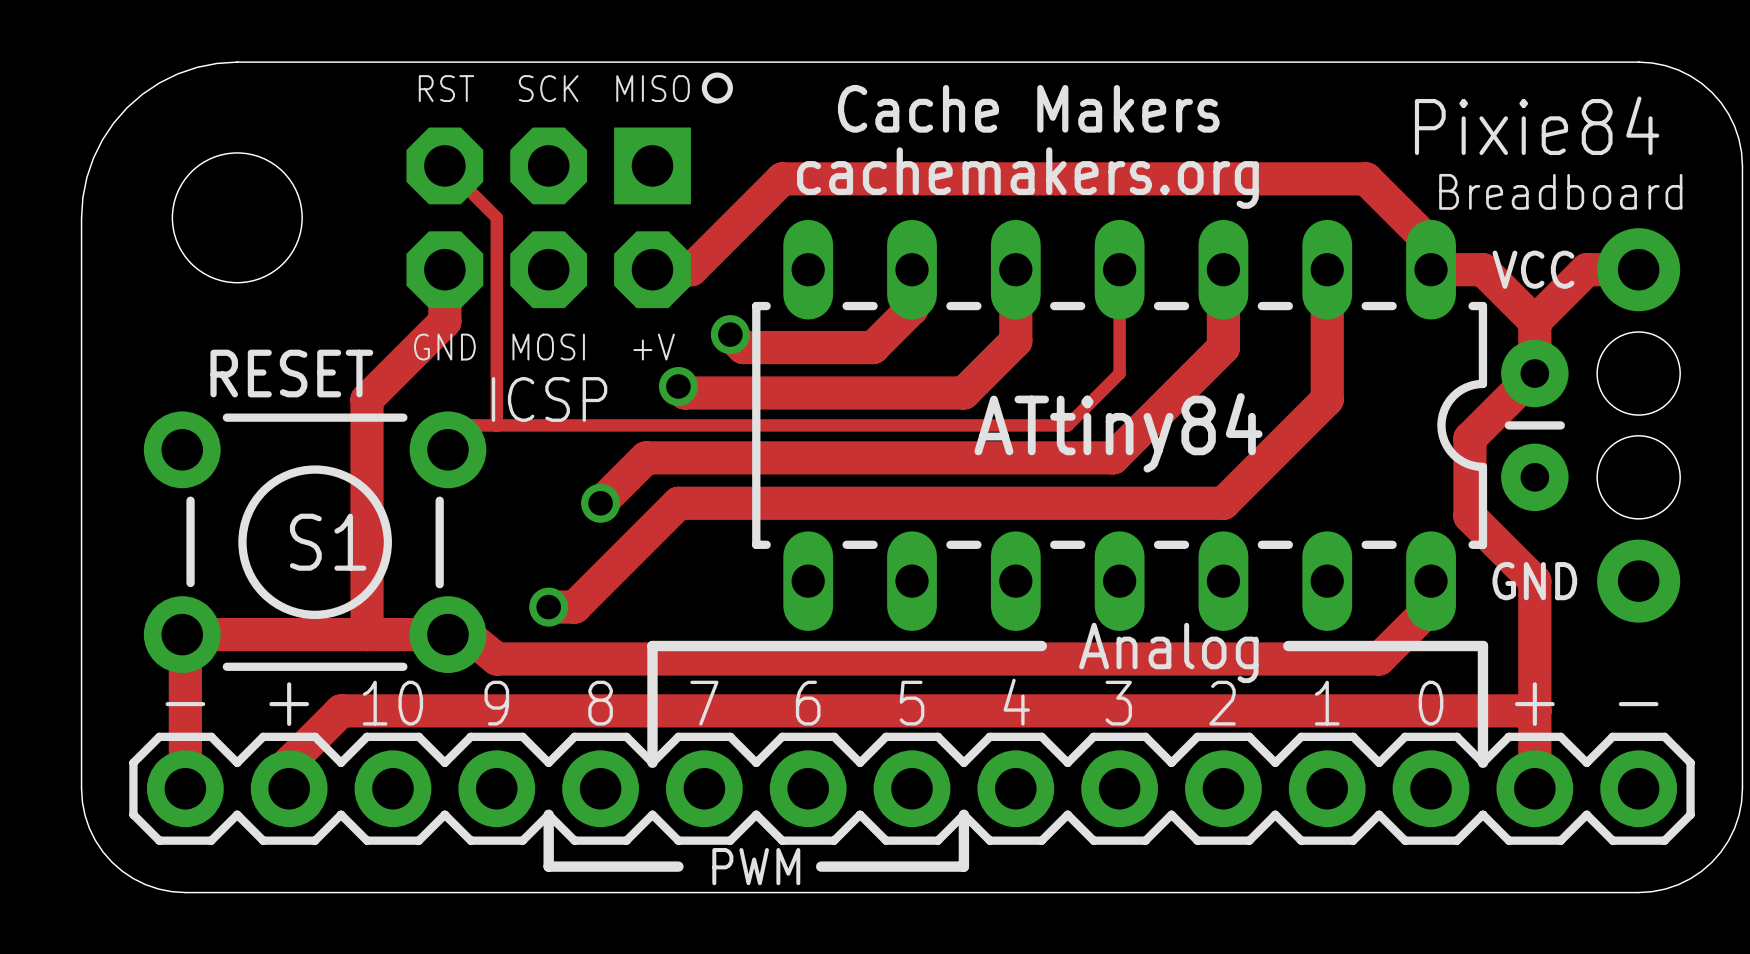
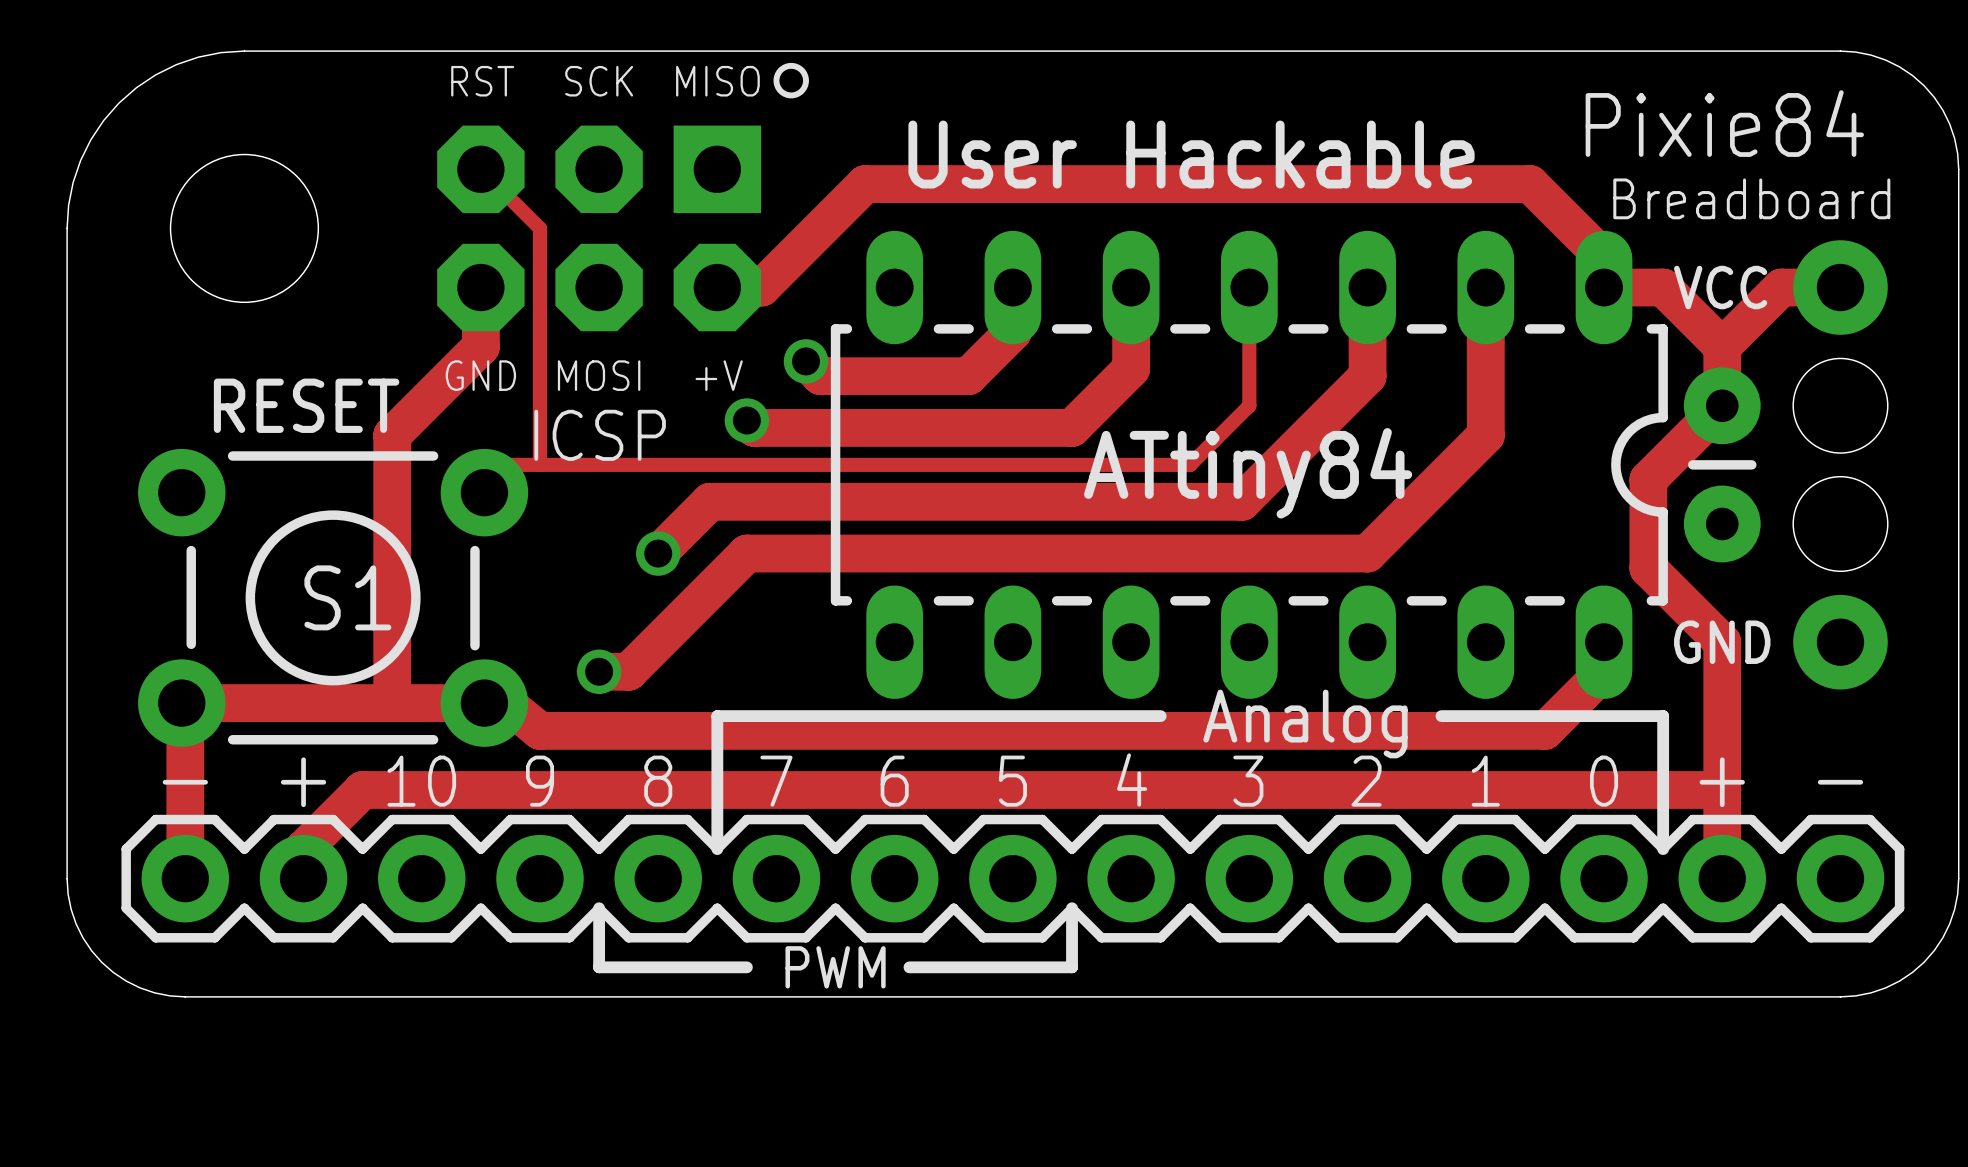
text: Cache Makers (1028, 108) -> none
text: none -> User Hackable (1191, 154)
text: cachemakers.org (1027, 178) -> none

